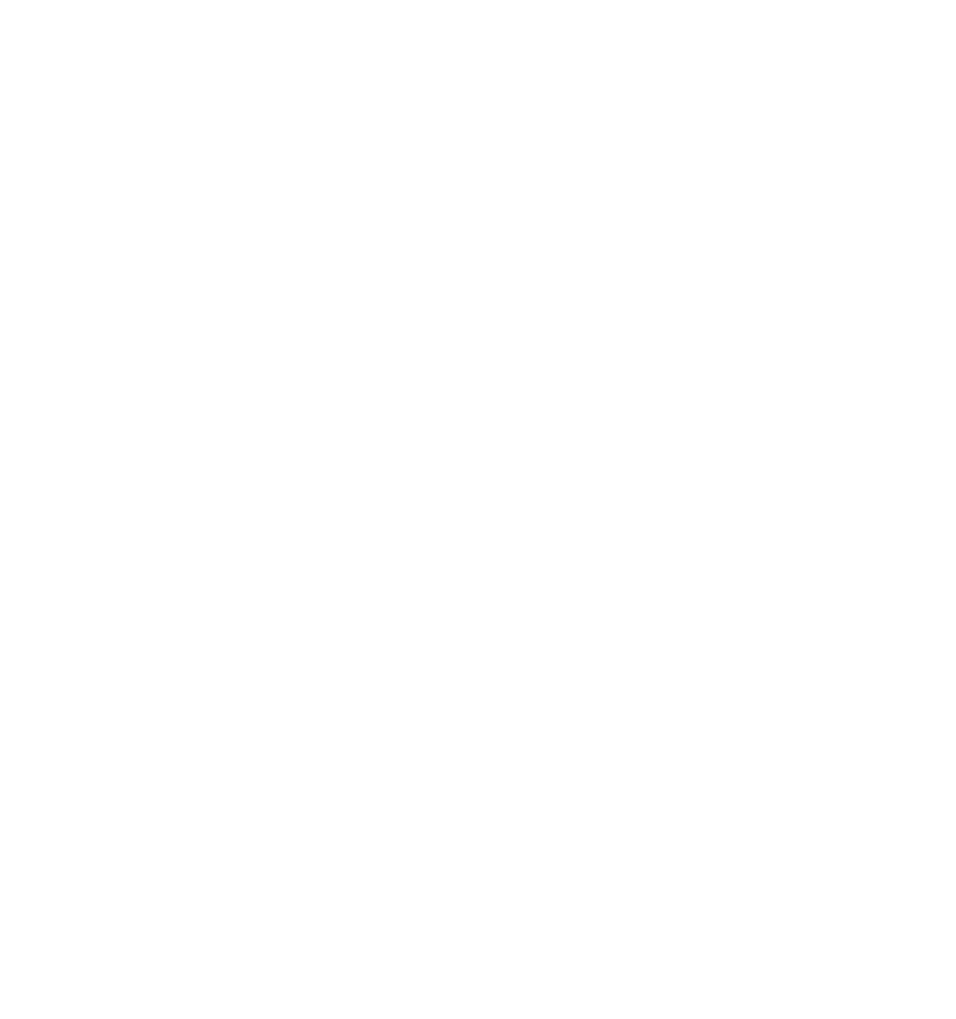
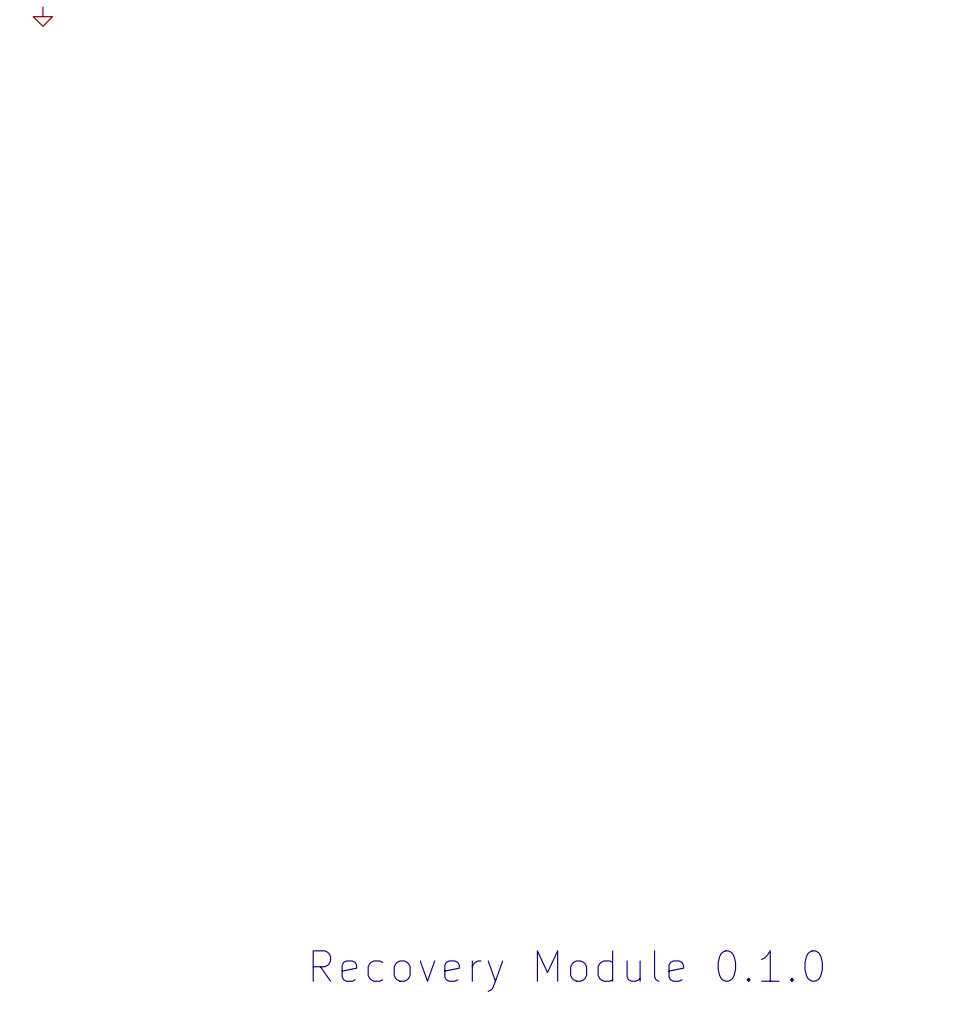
power symbol: none -> (42, 16)
text: none -> Recovery Module 0.1.0 (567, 971)

